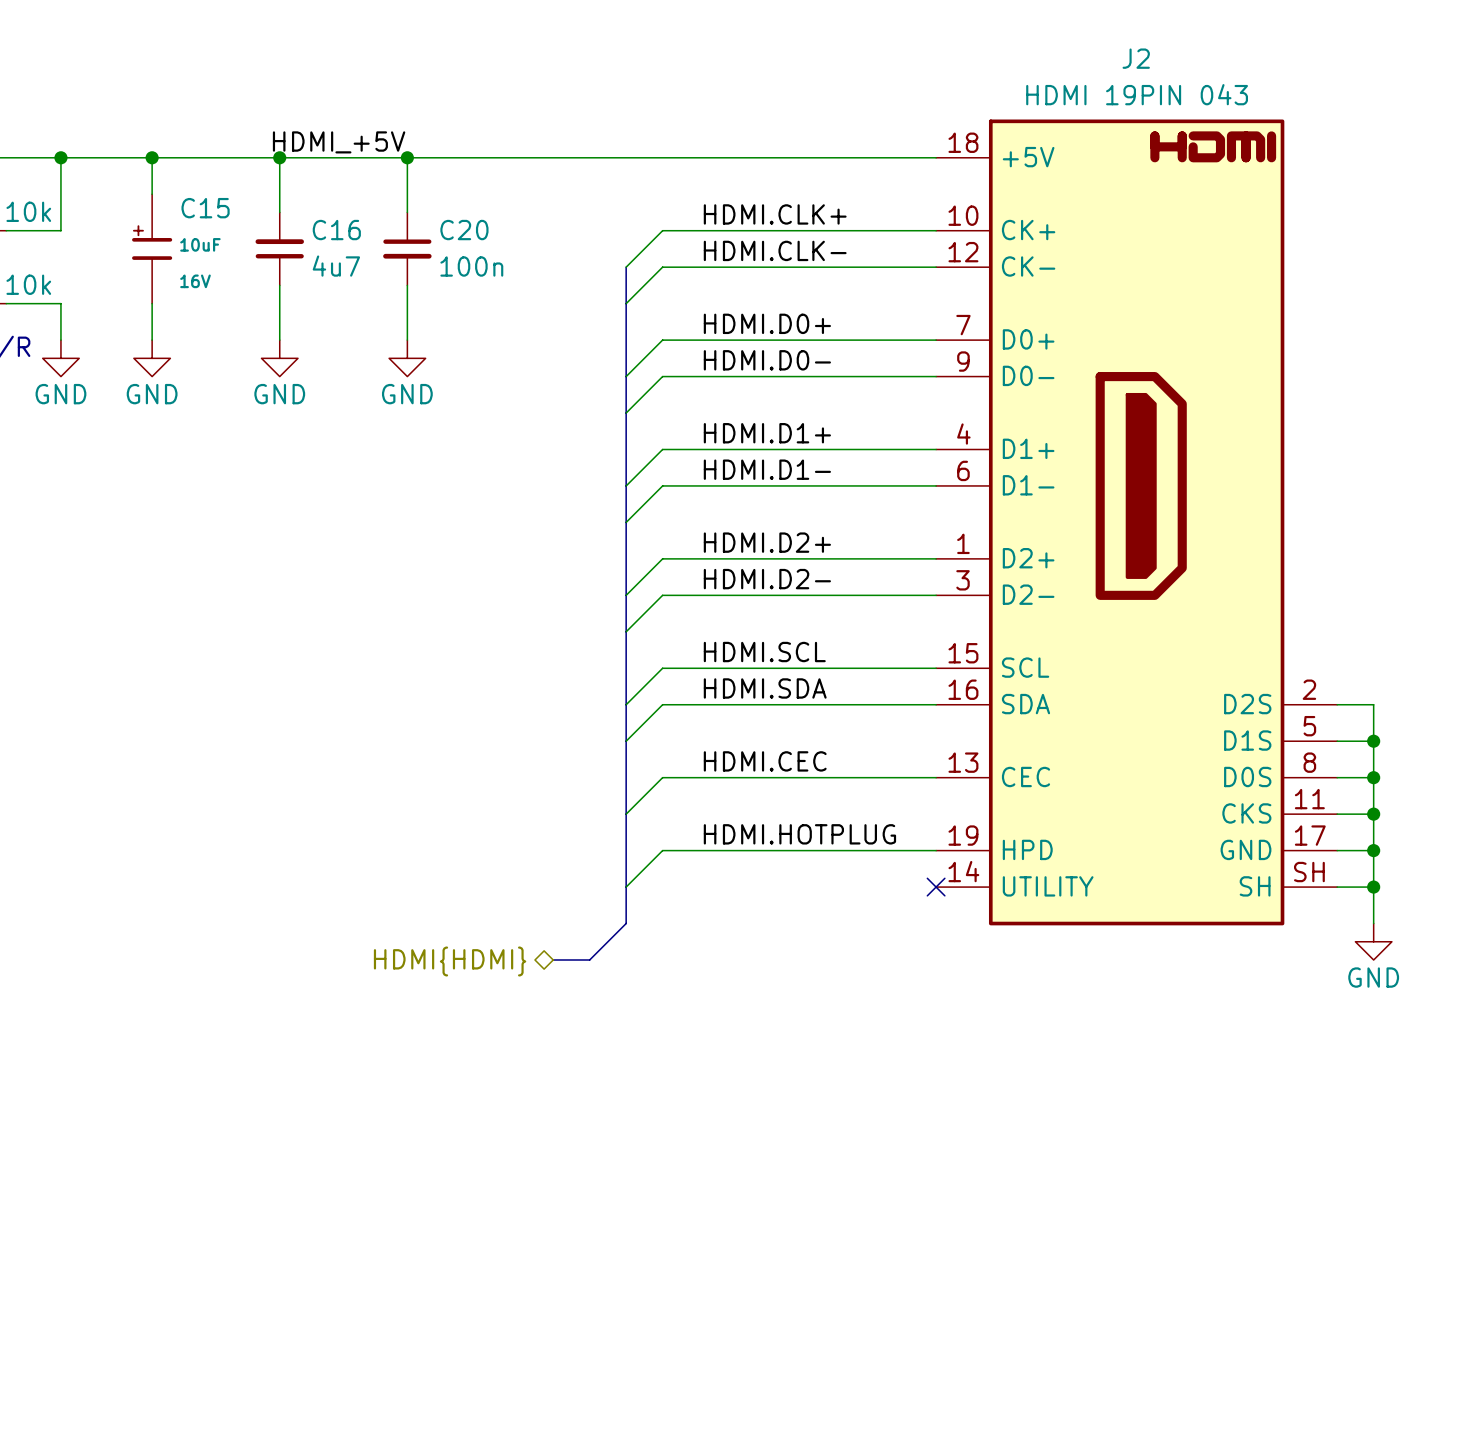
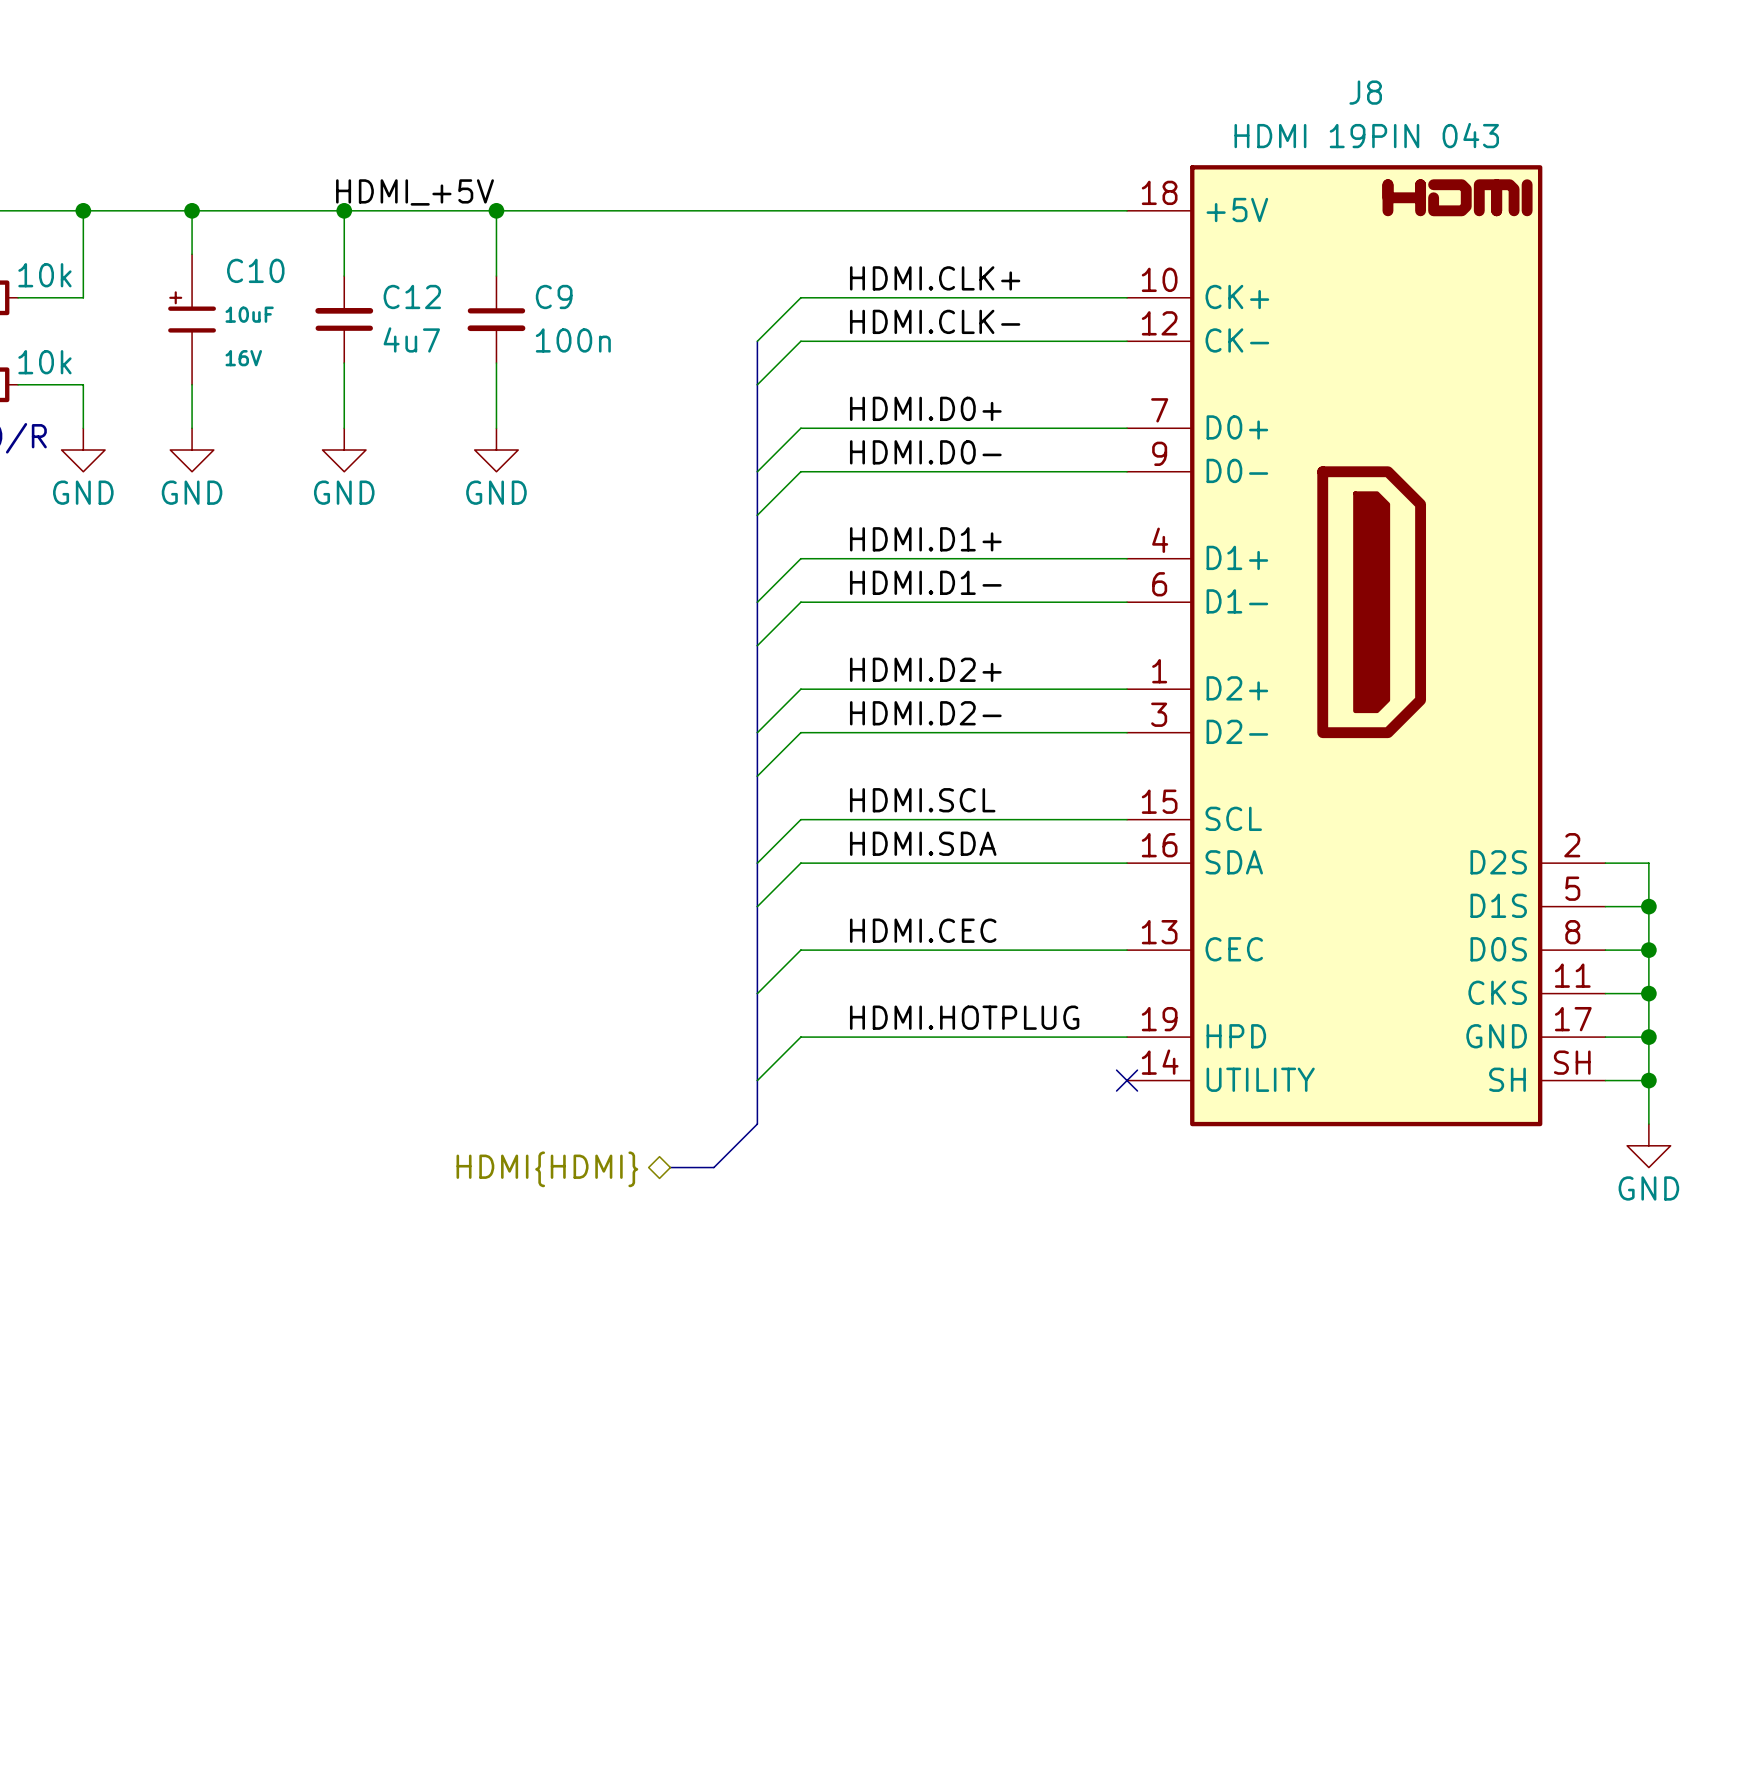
J2 name: J2 (1136, 58) -> J8 (1365, 92)
C15 name: C15 (205, 208) -> C10 (255, 270)
C16 name: C16 (336, 230) -> C12 (412, 296)
C20 name: C20 (464, 230) -> C9 (554, 296)

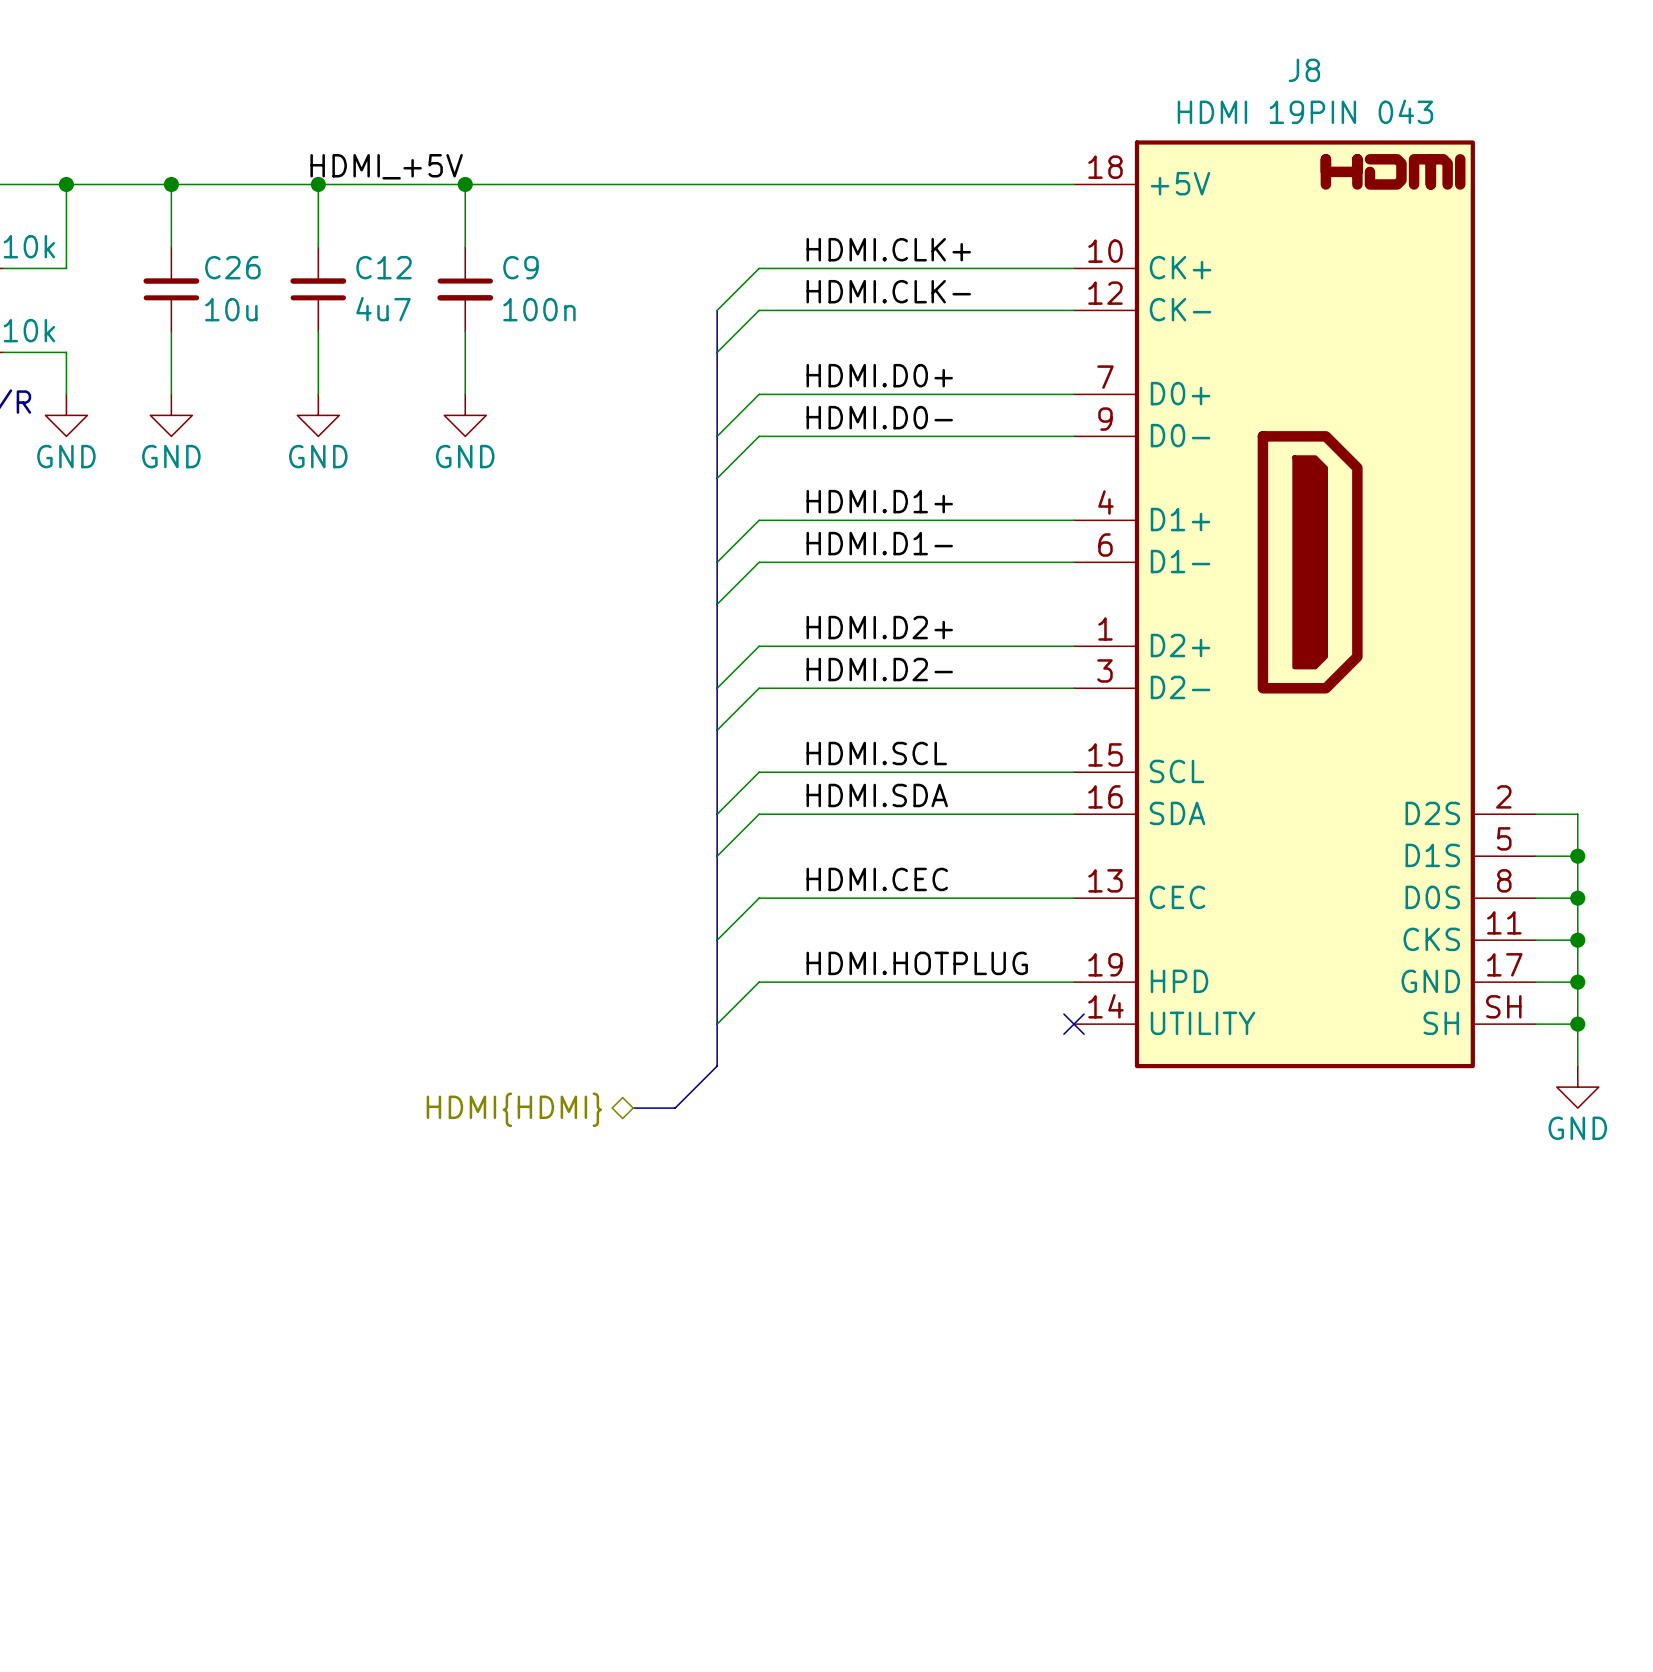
C10: 10uF (192, 319) -> none
C26: none -> (171, 289)

